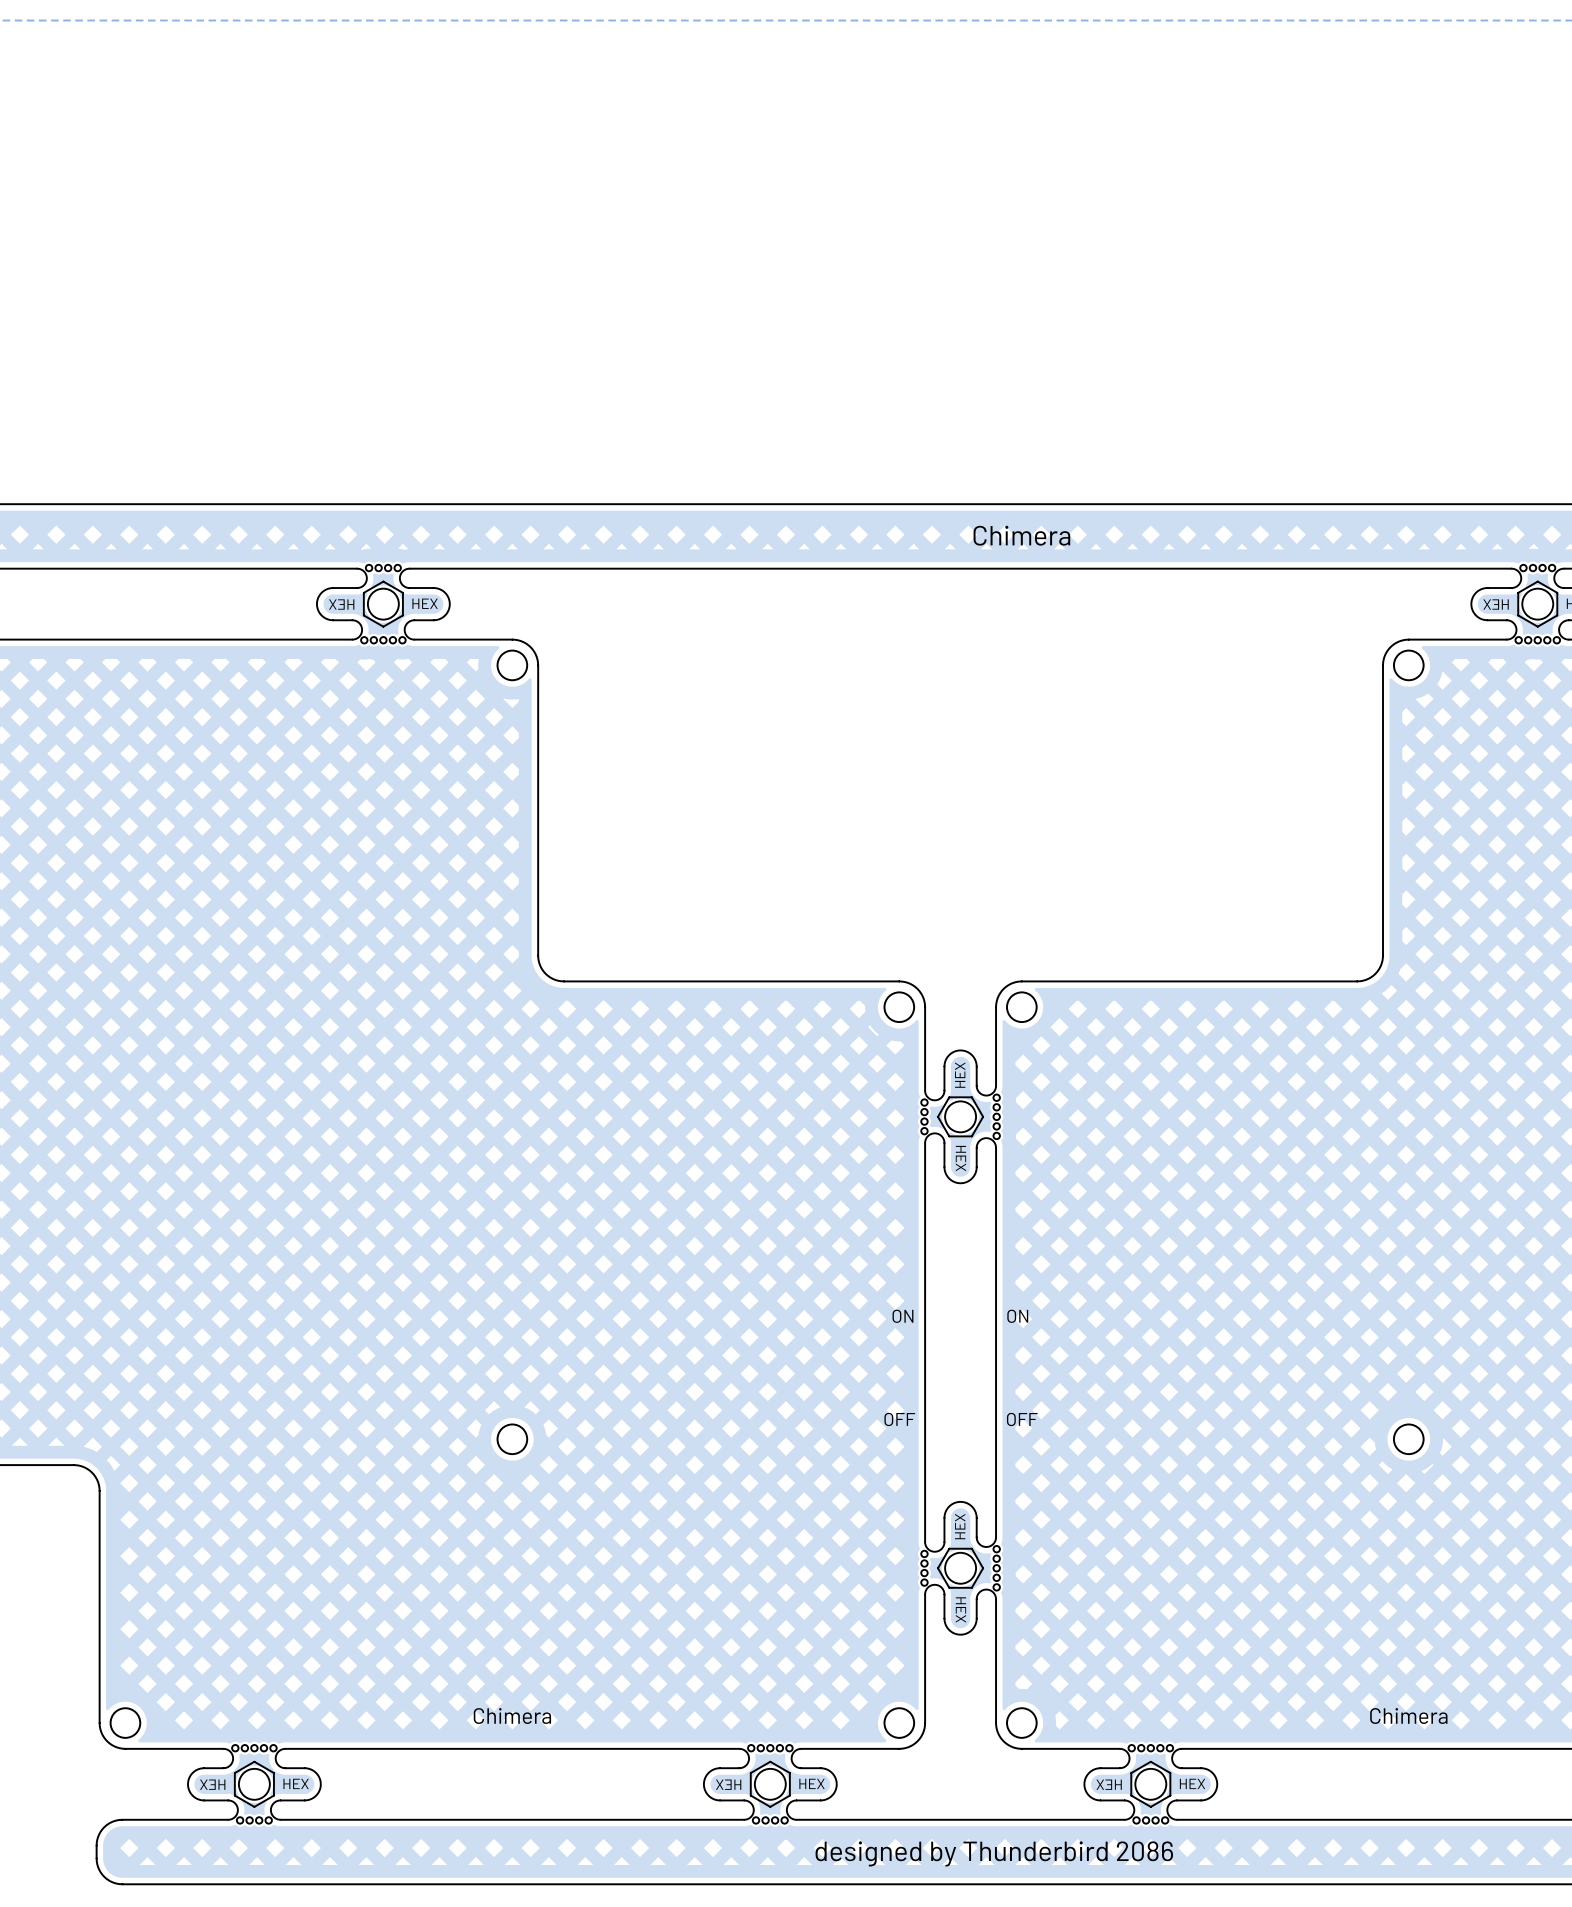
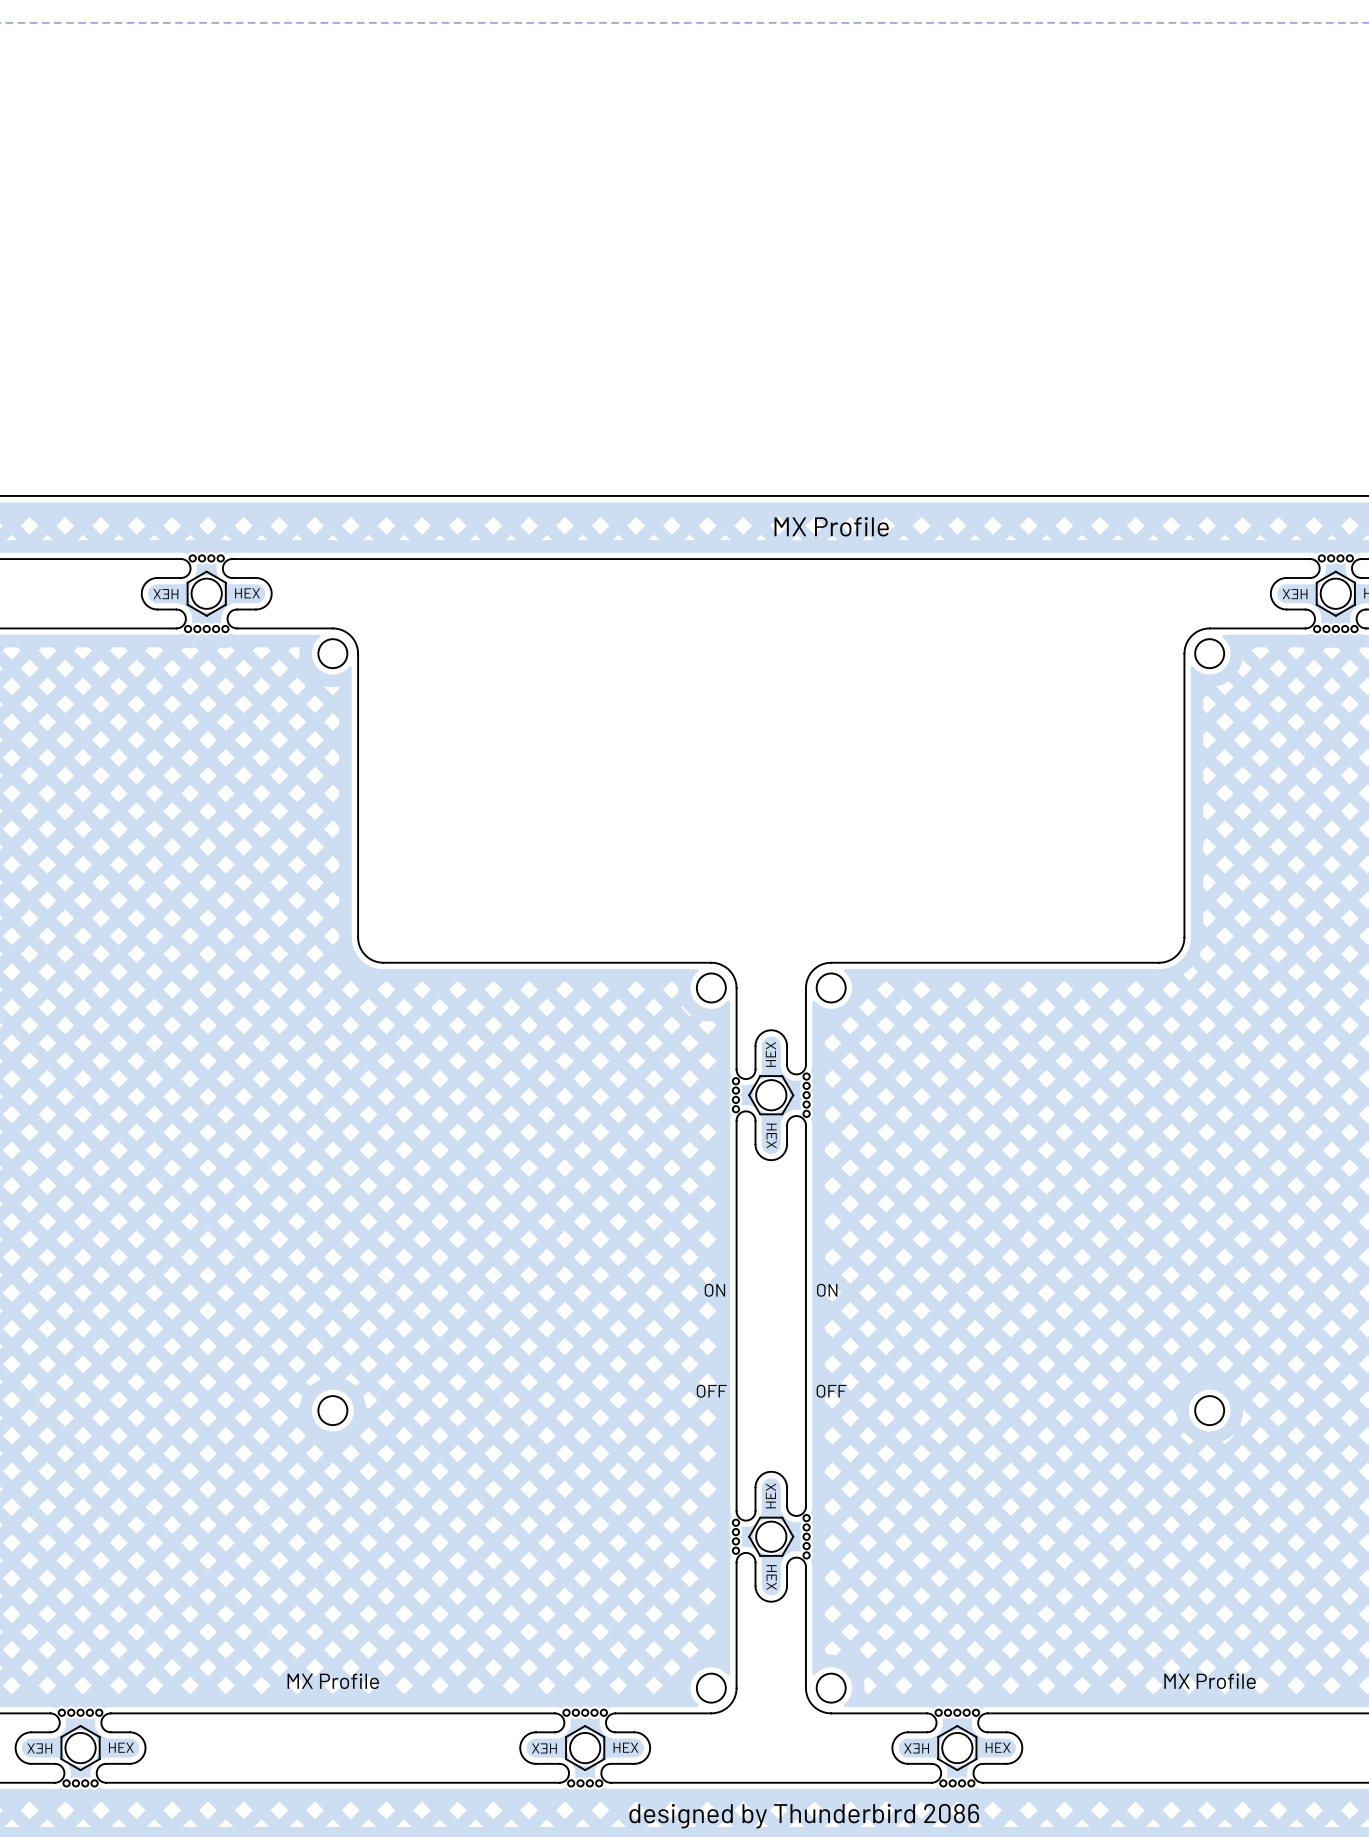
text: Chimera (1021, 535) -> MX Profile (831, 526)
text: Chimera (512, 1716) -> MX Profile (333, 1681)
text: Chimera (1408, 1716) -> MX Profile (1210, 1681)

